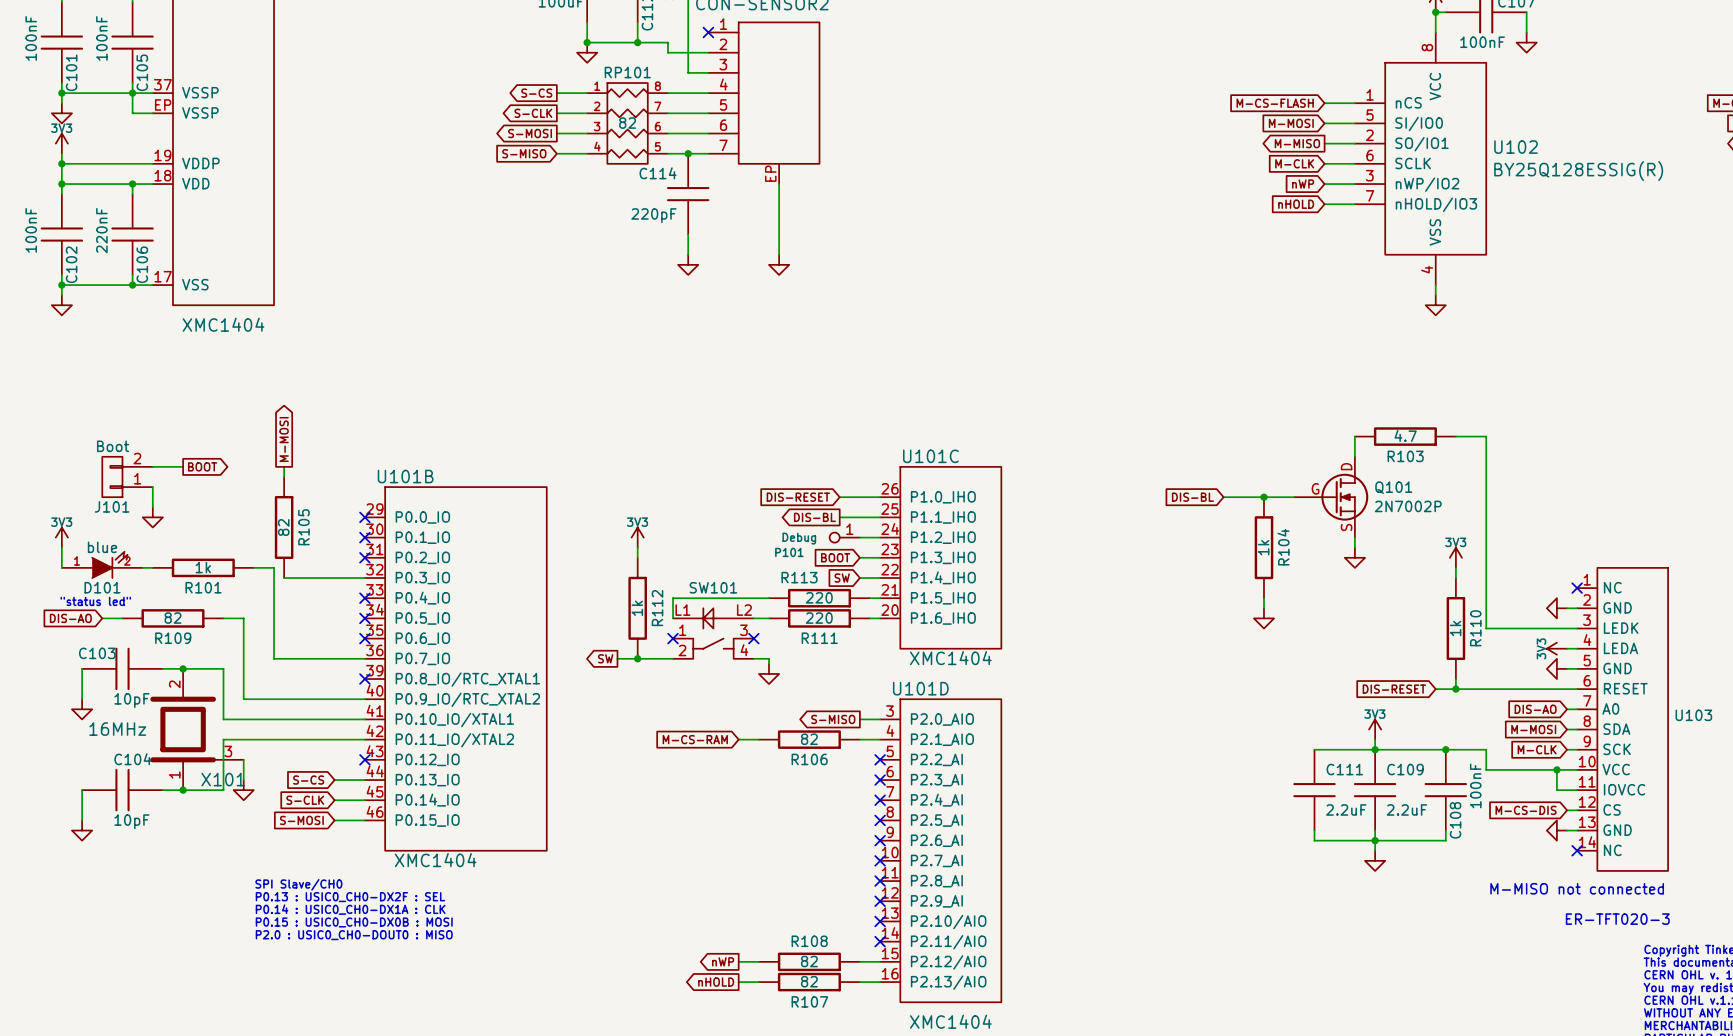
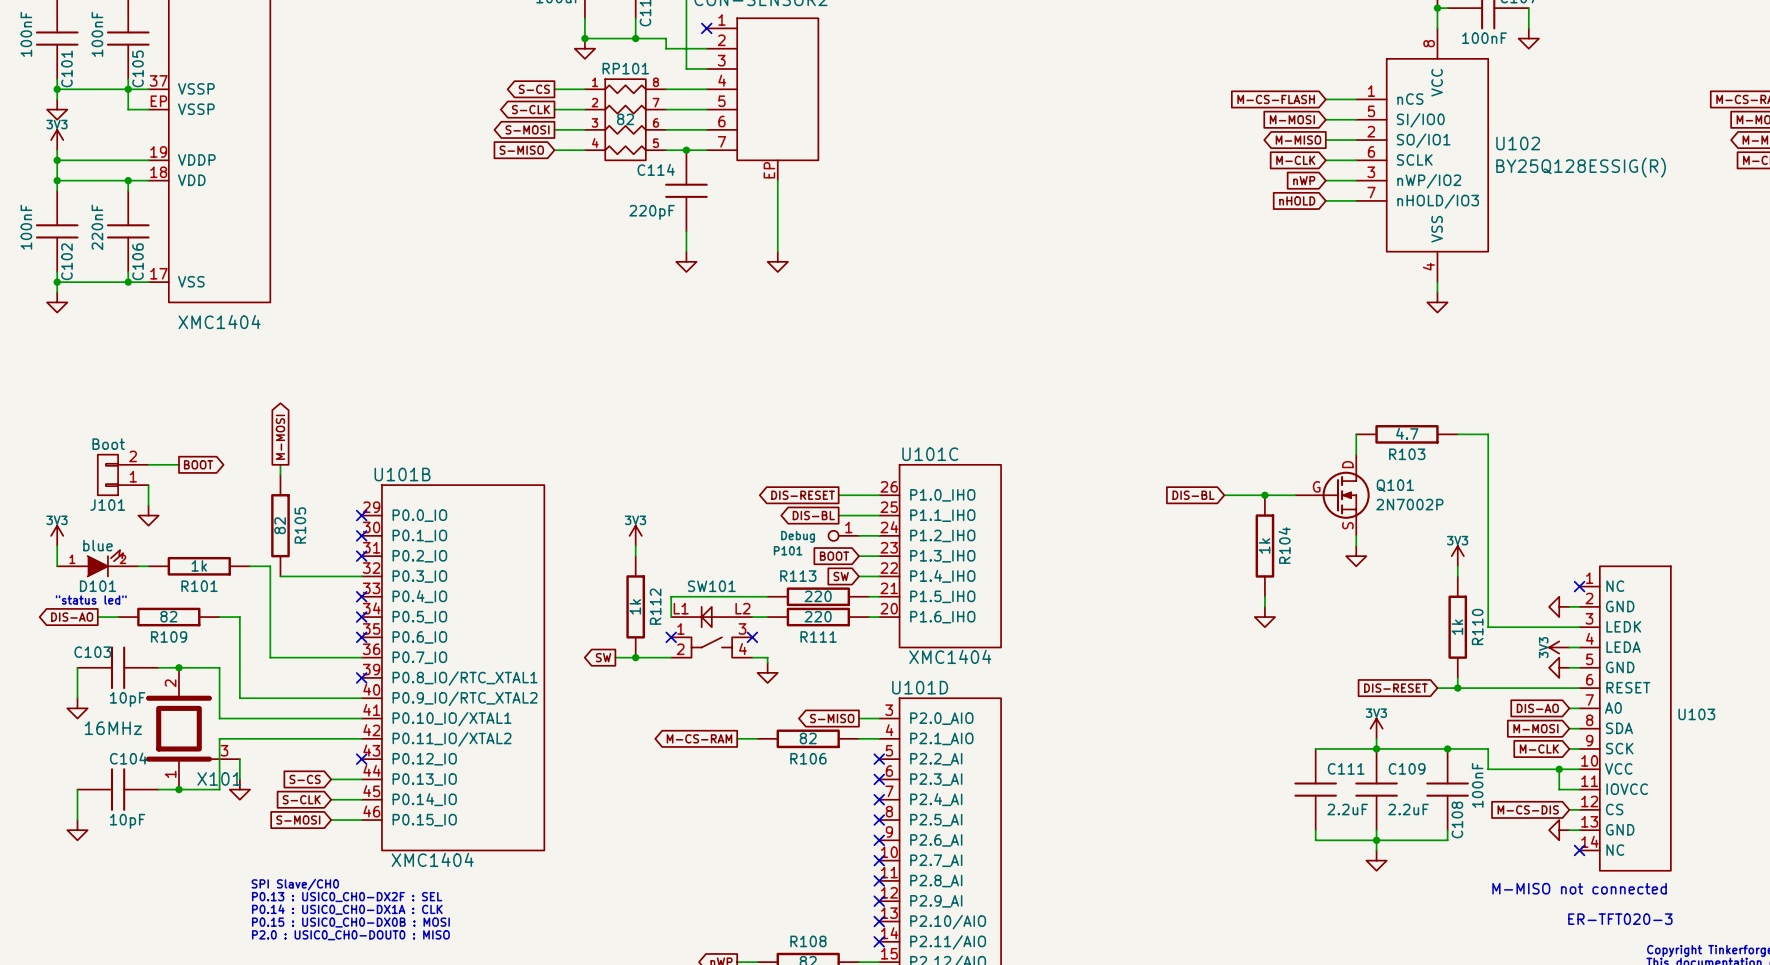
global label shape: input (798, 497) -> output (803, 495)
global label shape: input (70, 618) -> output (72, 617)
global label shape: input (695, 739) -> output (699, 738)

